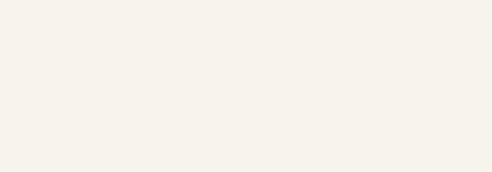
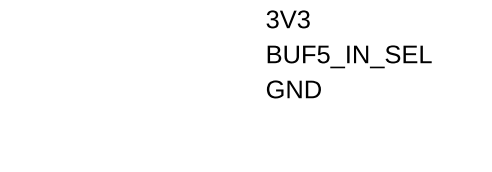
label: none -> 3V3 (288, 19)
label: none -> BUF5_IN_SEL (349, 56)
label: none -> GND (293, 89)

